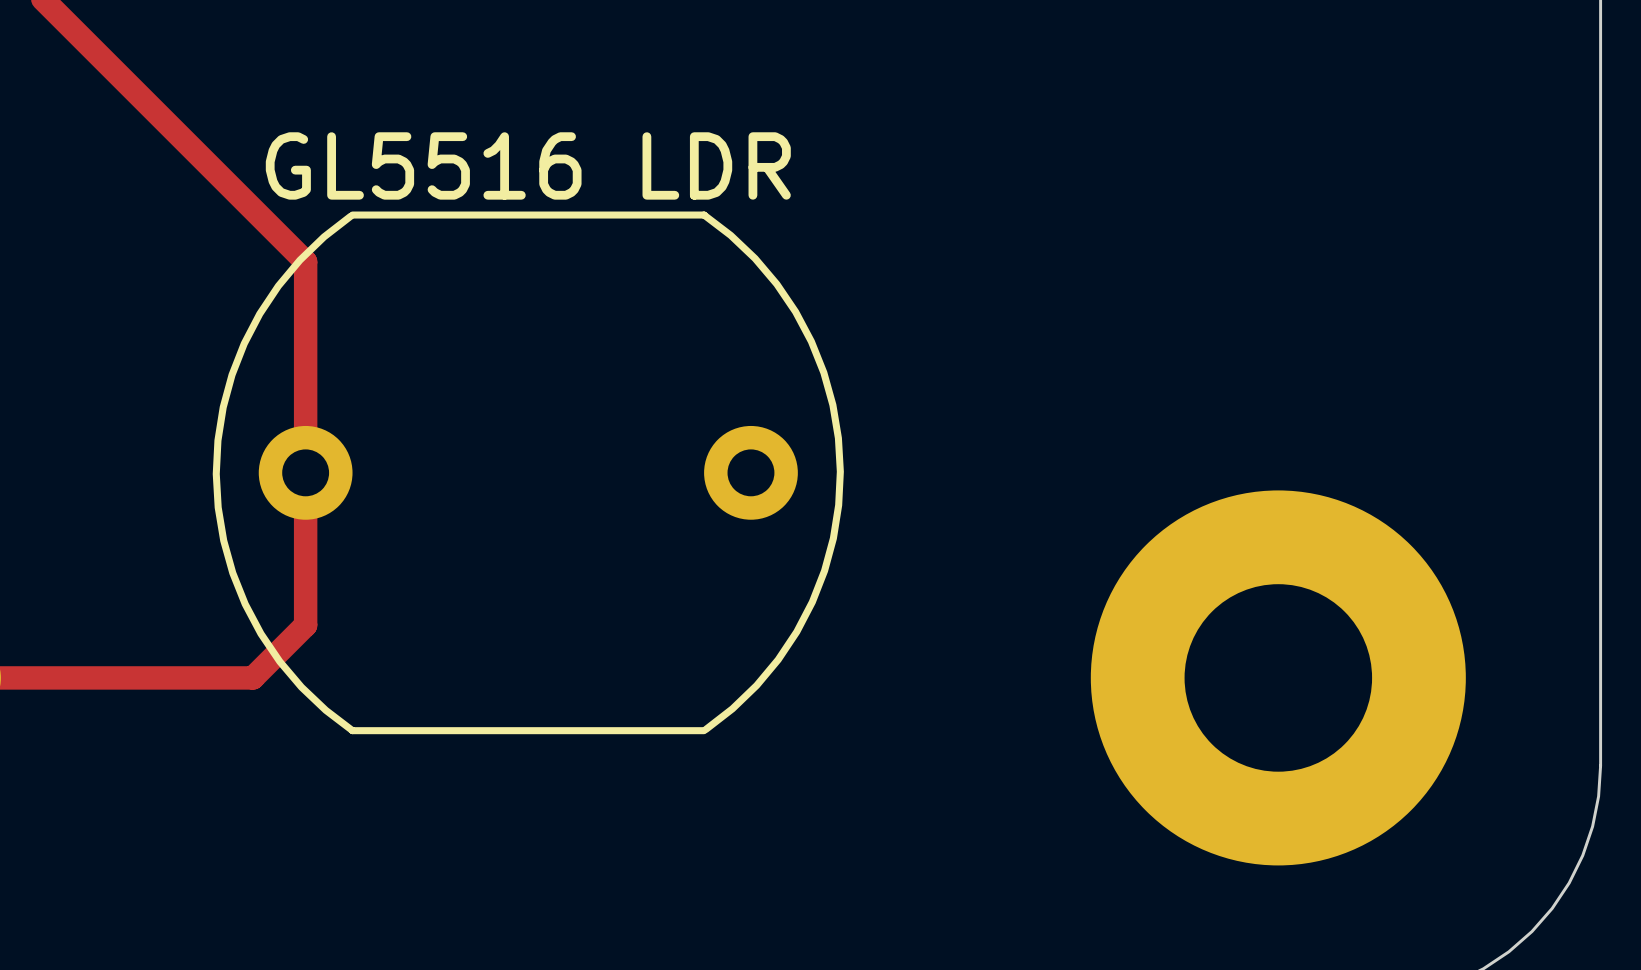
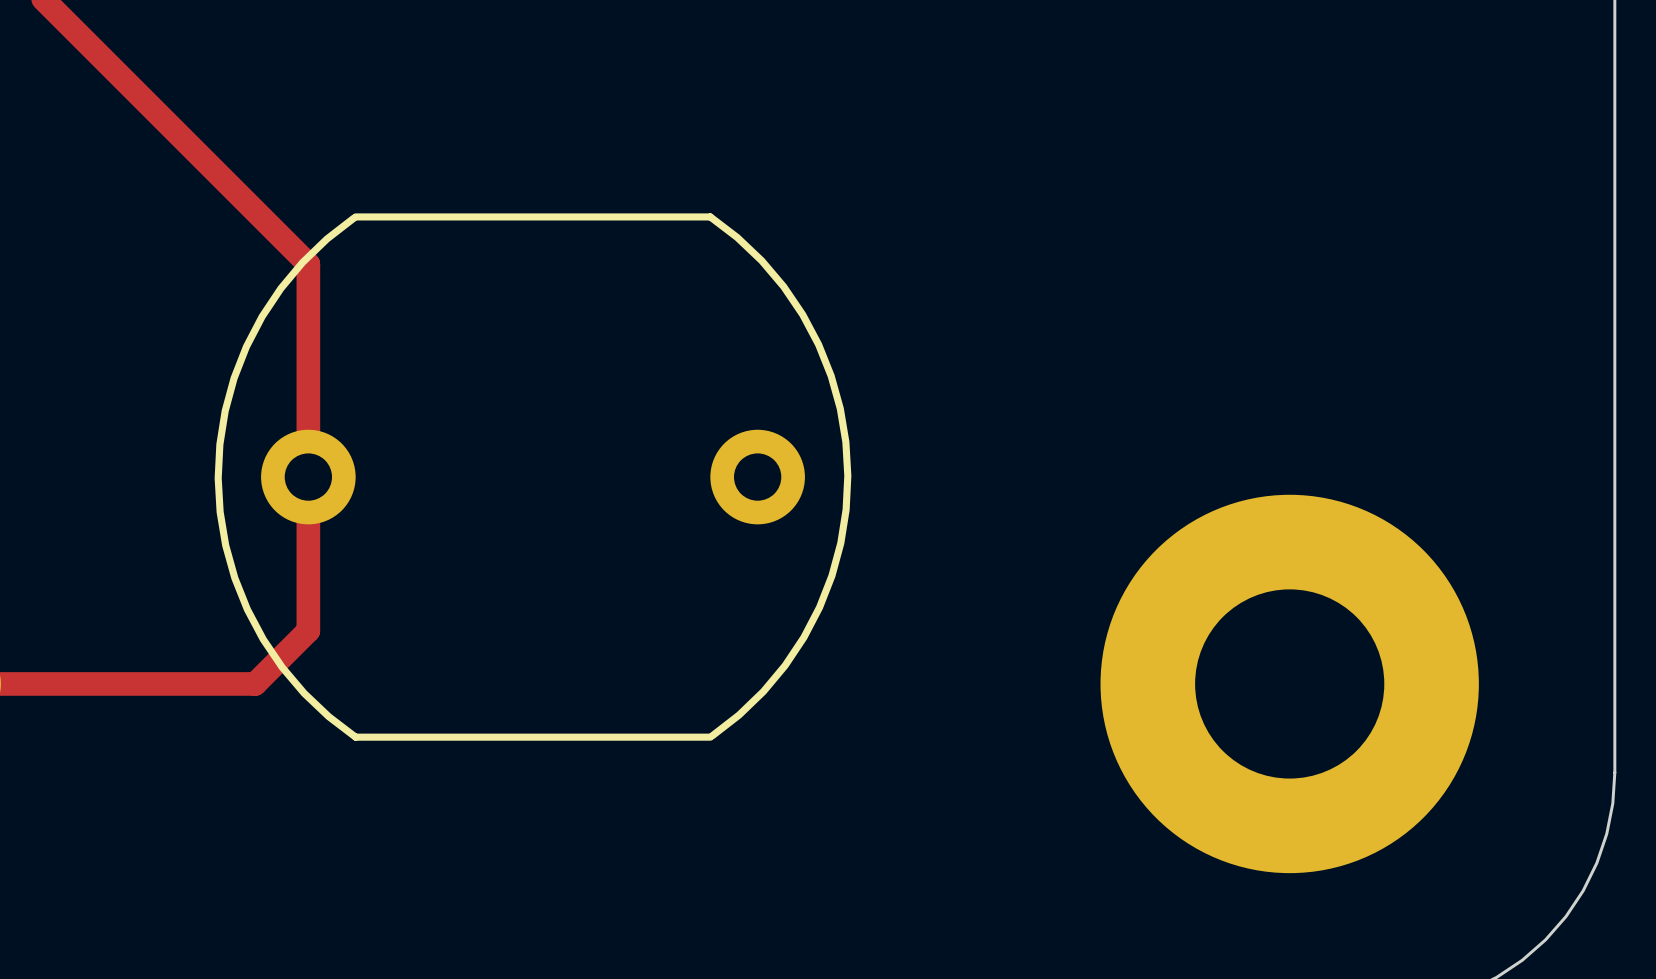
GL5516 LDR name: GL5516 LDR (528, 165) -> none

